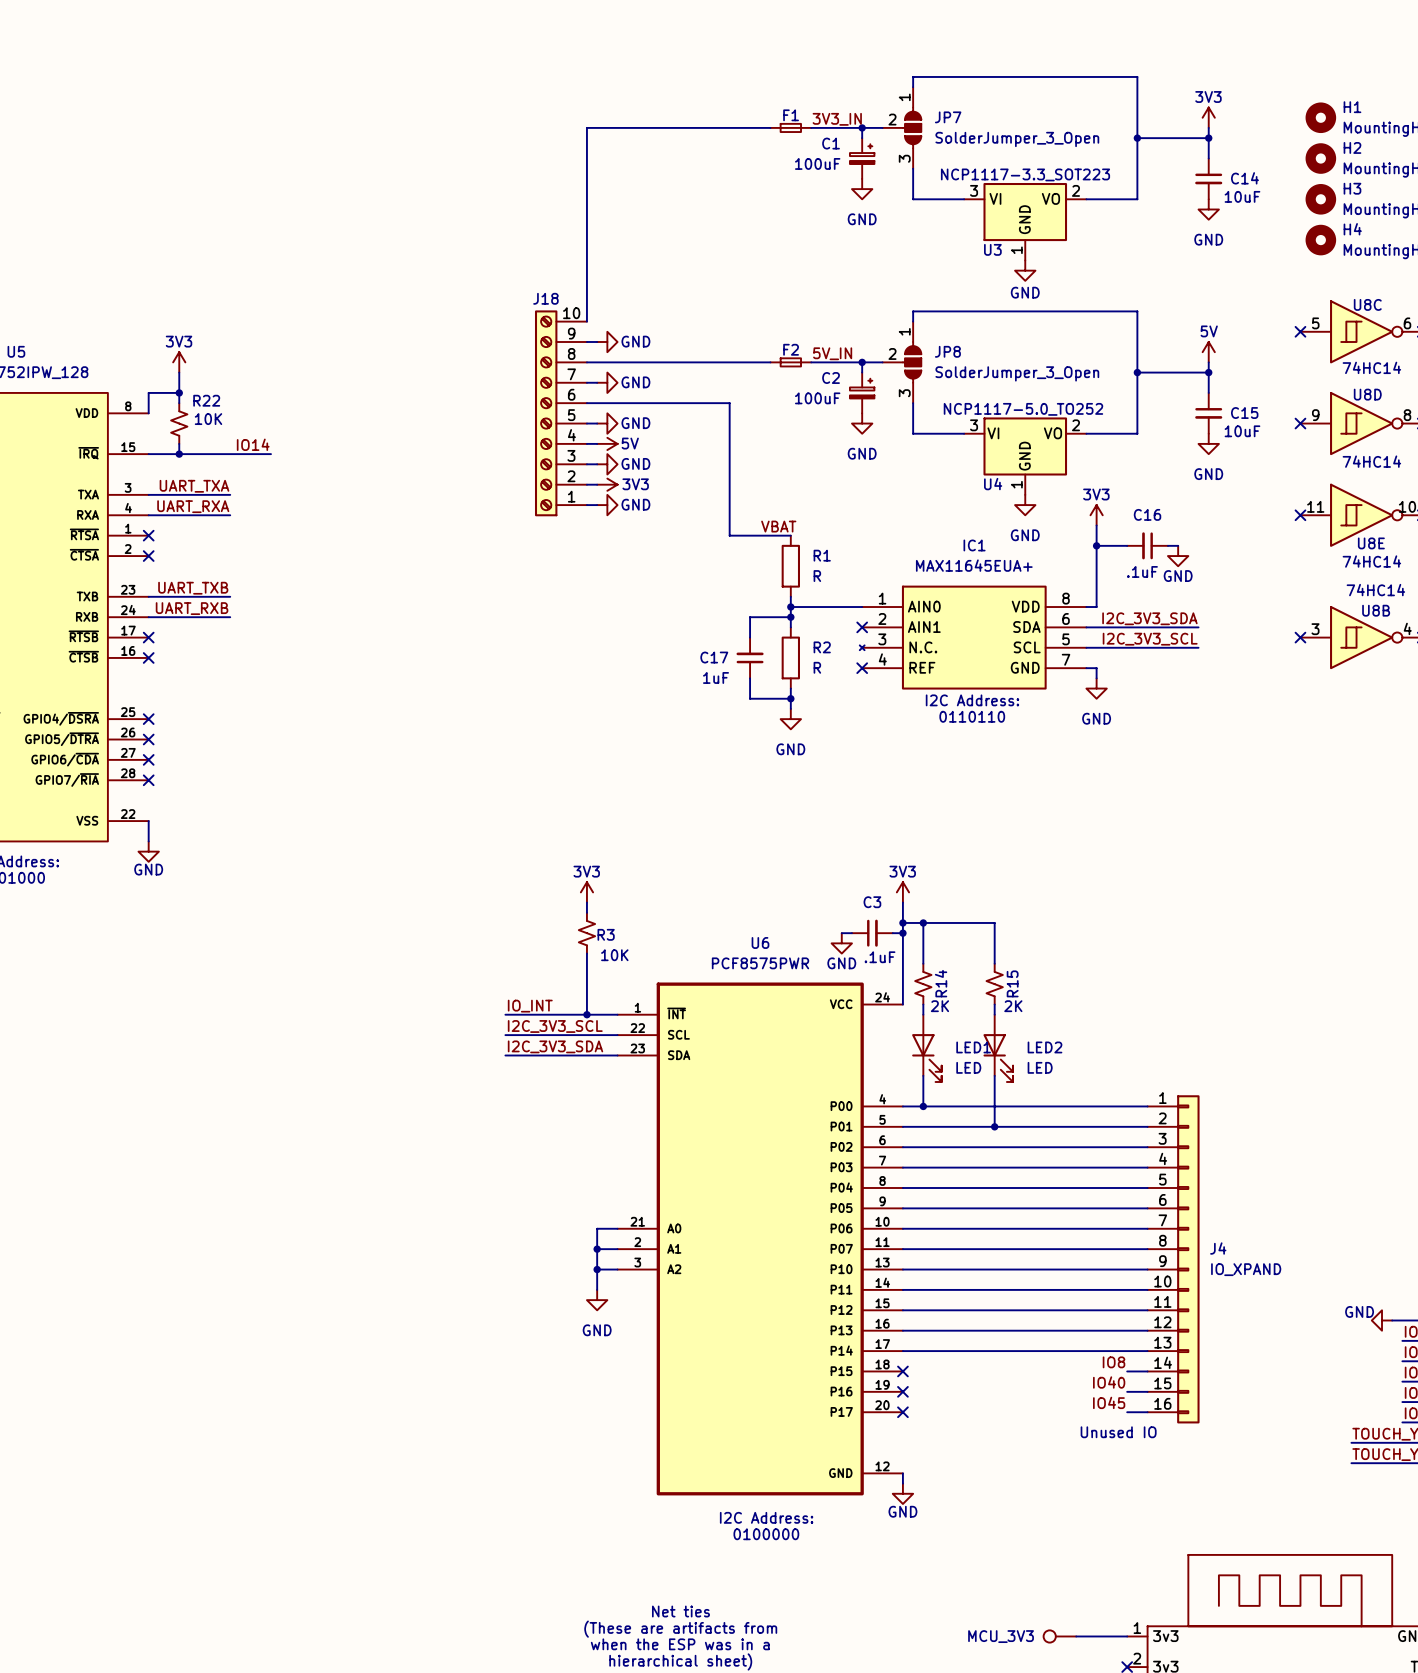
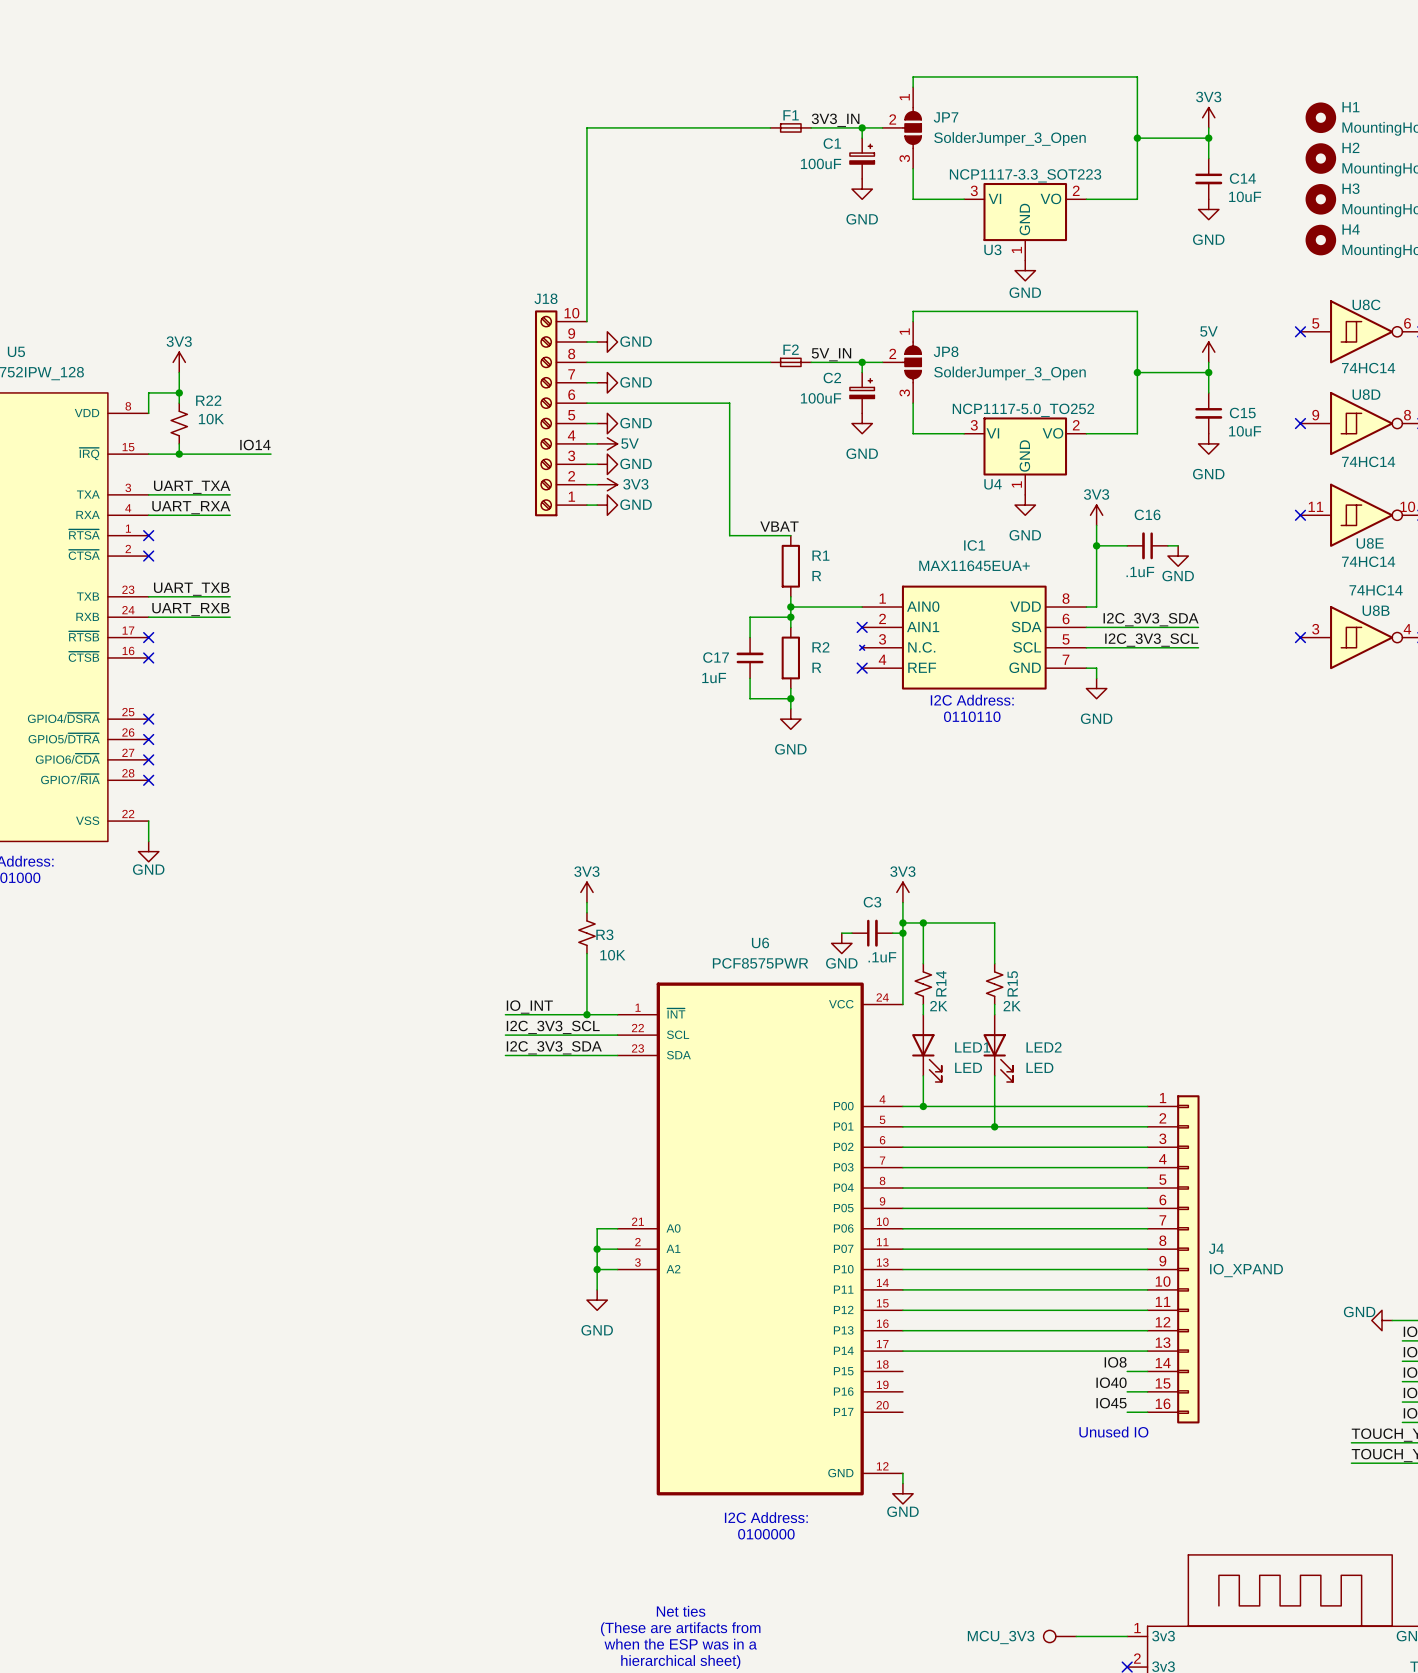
no-connect mark: (902, 1371) -> none
no-connect mark: (902, 1391) -> none
no-connect mark: (902, 1412) -> none

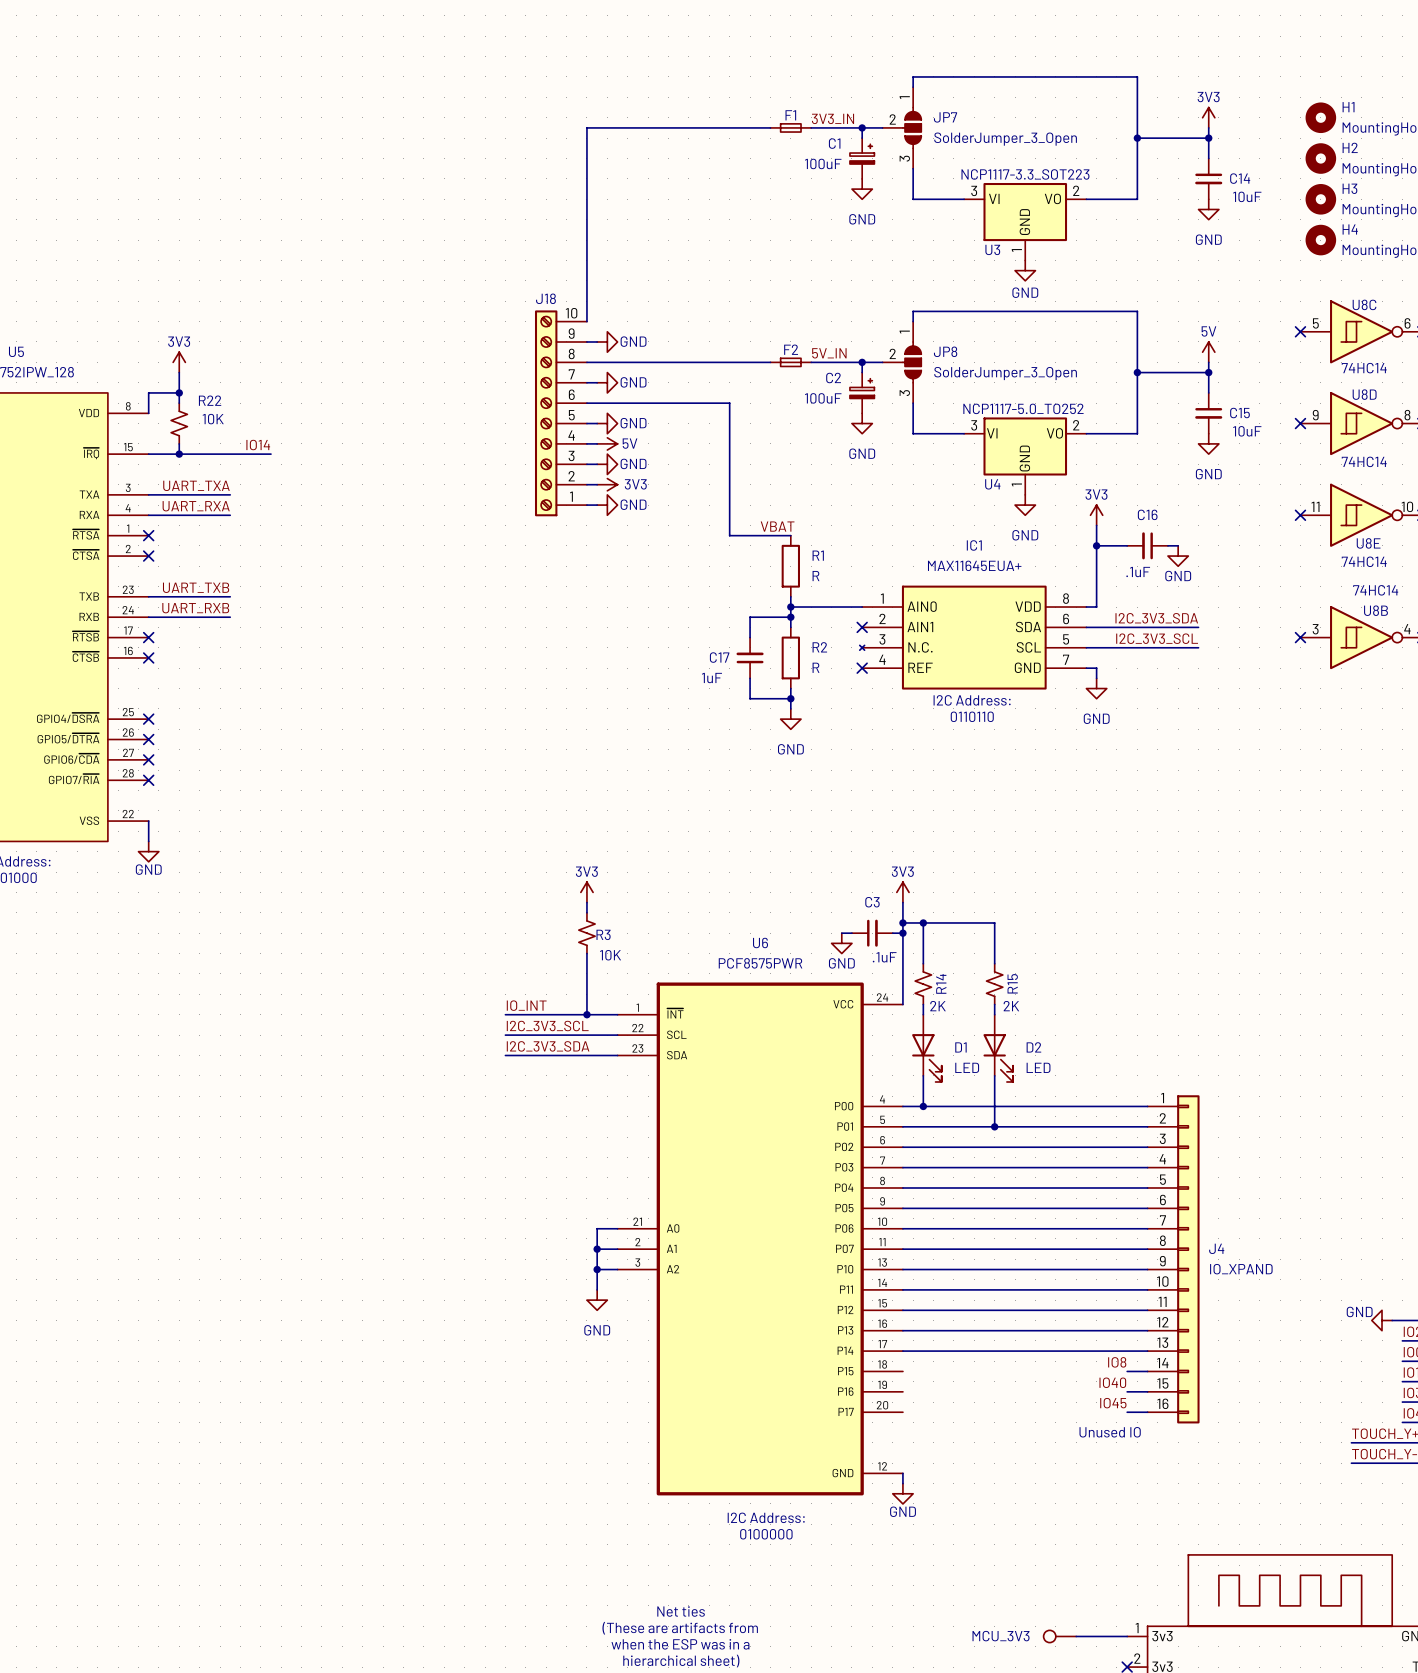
LED1 name: LED1 (972, 1047) -> D1 (960, 1047)
LED2 name: LED2 (1044, 1047) -> D2 (1033, 1047)

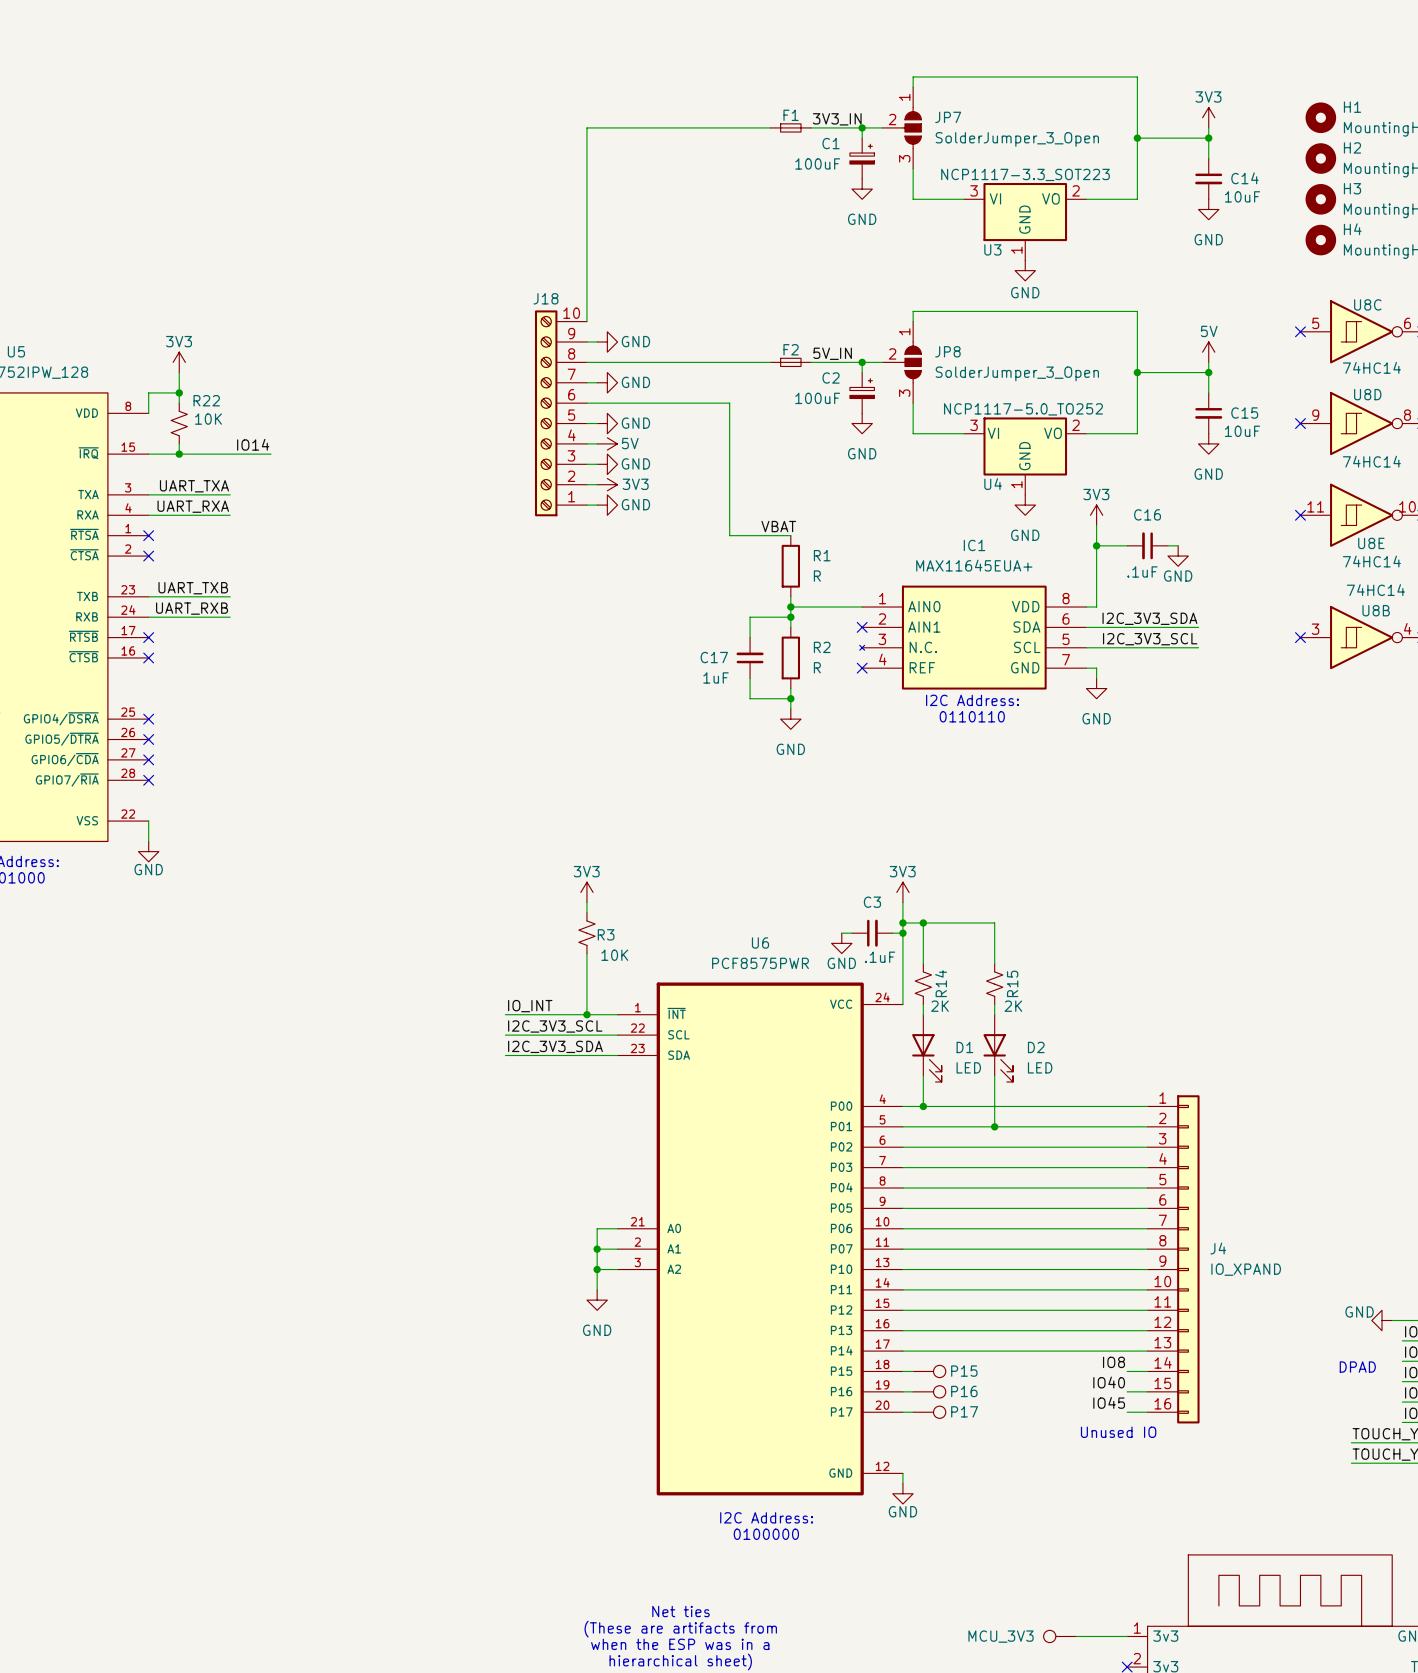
text: none -> DPAD (1357, 1367)
wire: none -> (902, 1371) (913, 1371)
P15: none -> (929, 1371)
wire: none -> (902, 1391) (913, 1391)
P16: none -> (929, 1391)
wire: none -> (902, 1412) (913, 1412)
P17: none -> (929, 1412)

